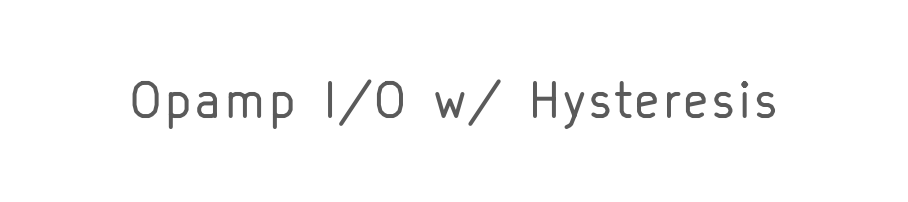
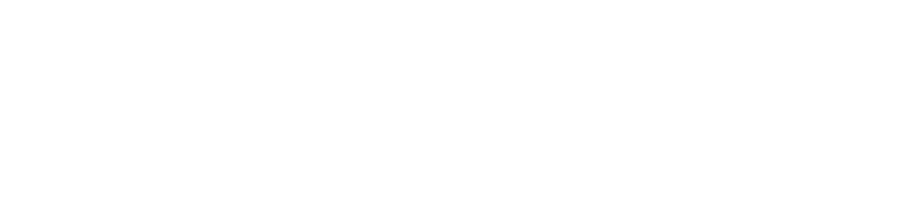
text: Opamp I/O w/ Hysteresis (453, 104) -> none

